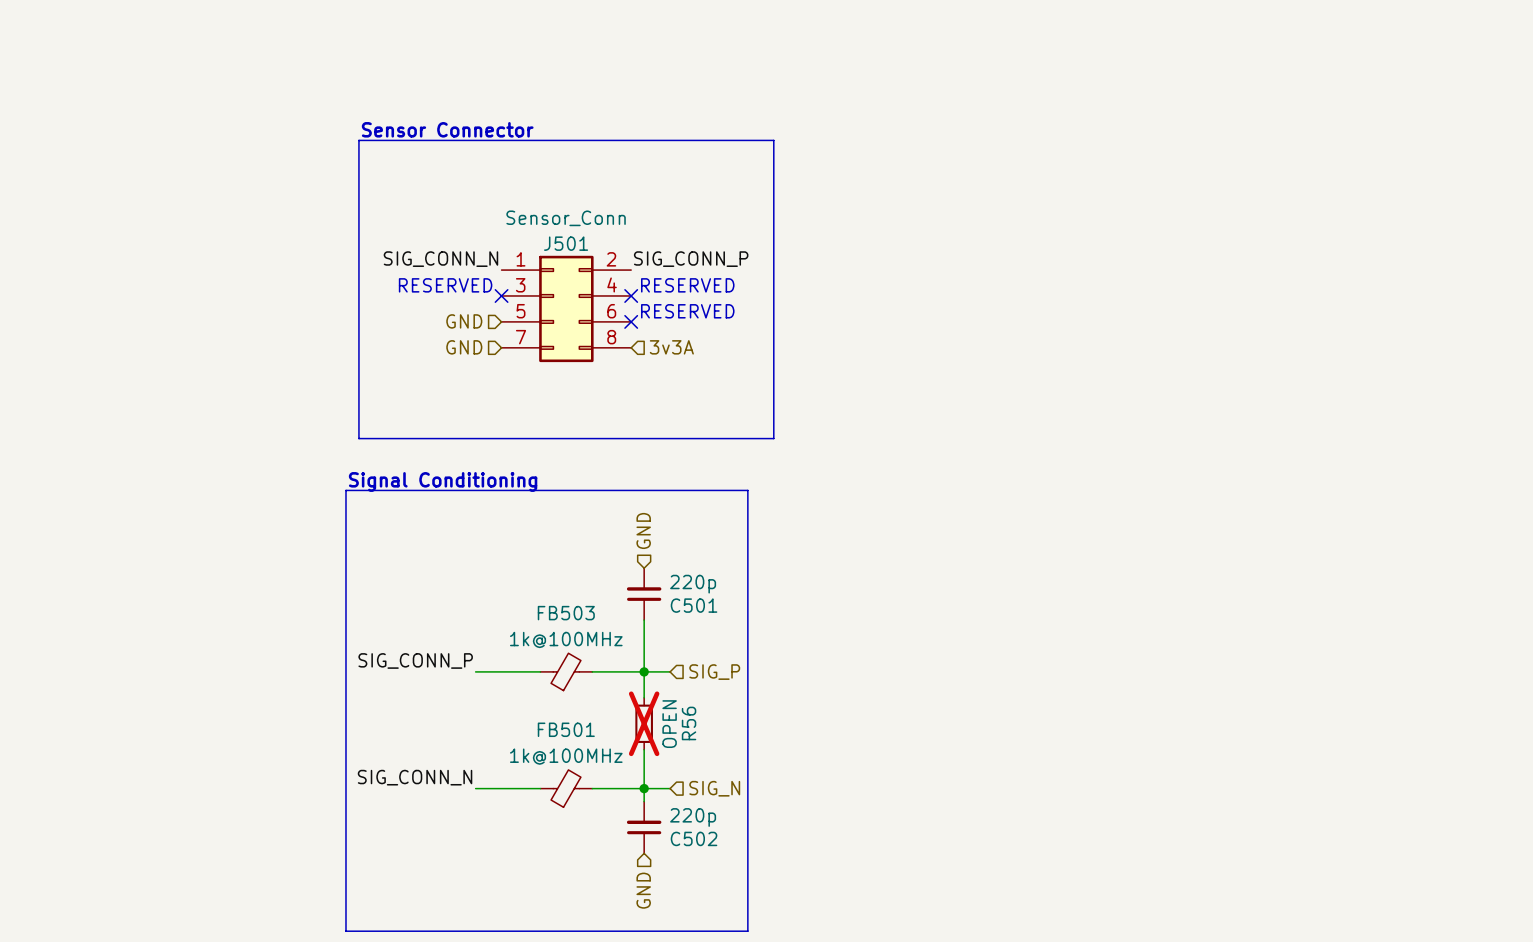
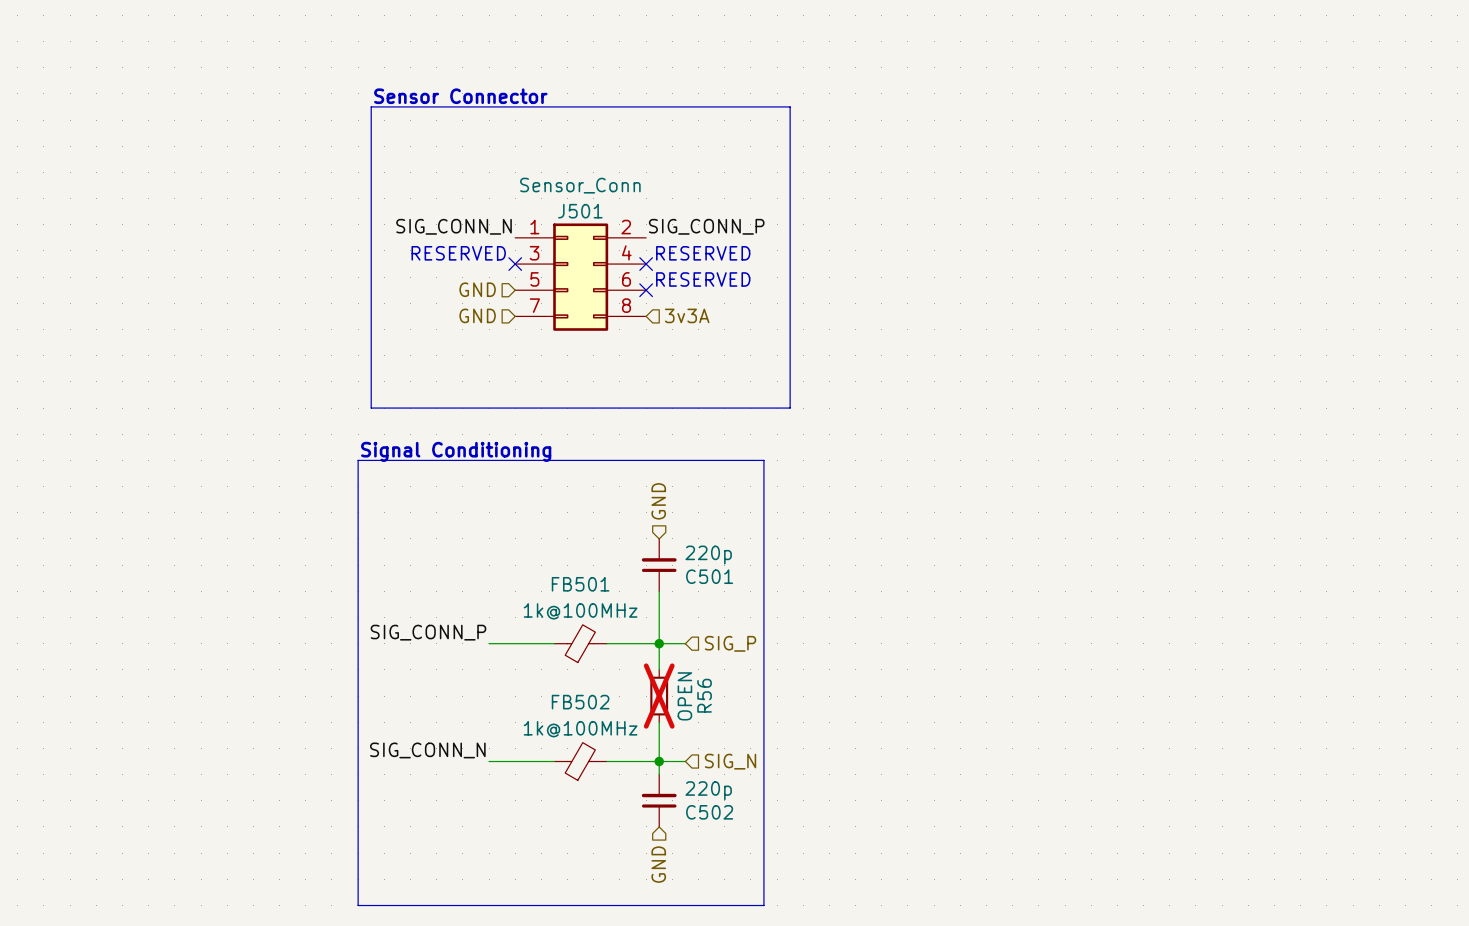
FB503 name: FB503 (566, 613) -> FB501 (580, 584)
FB501 name: FB501 (566, 729) -> FB502 (580, 702)

